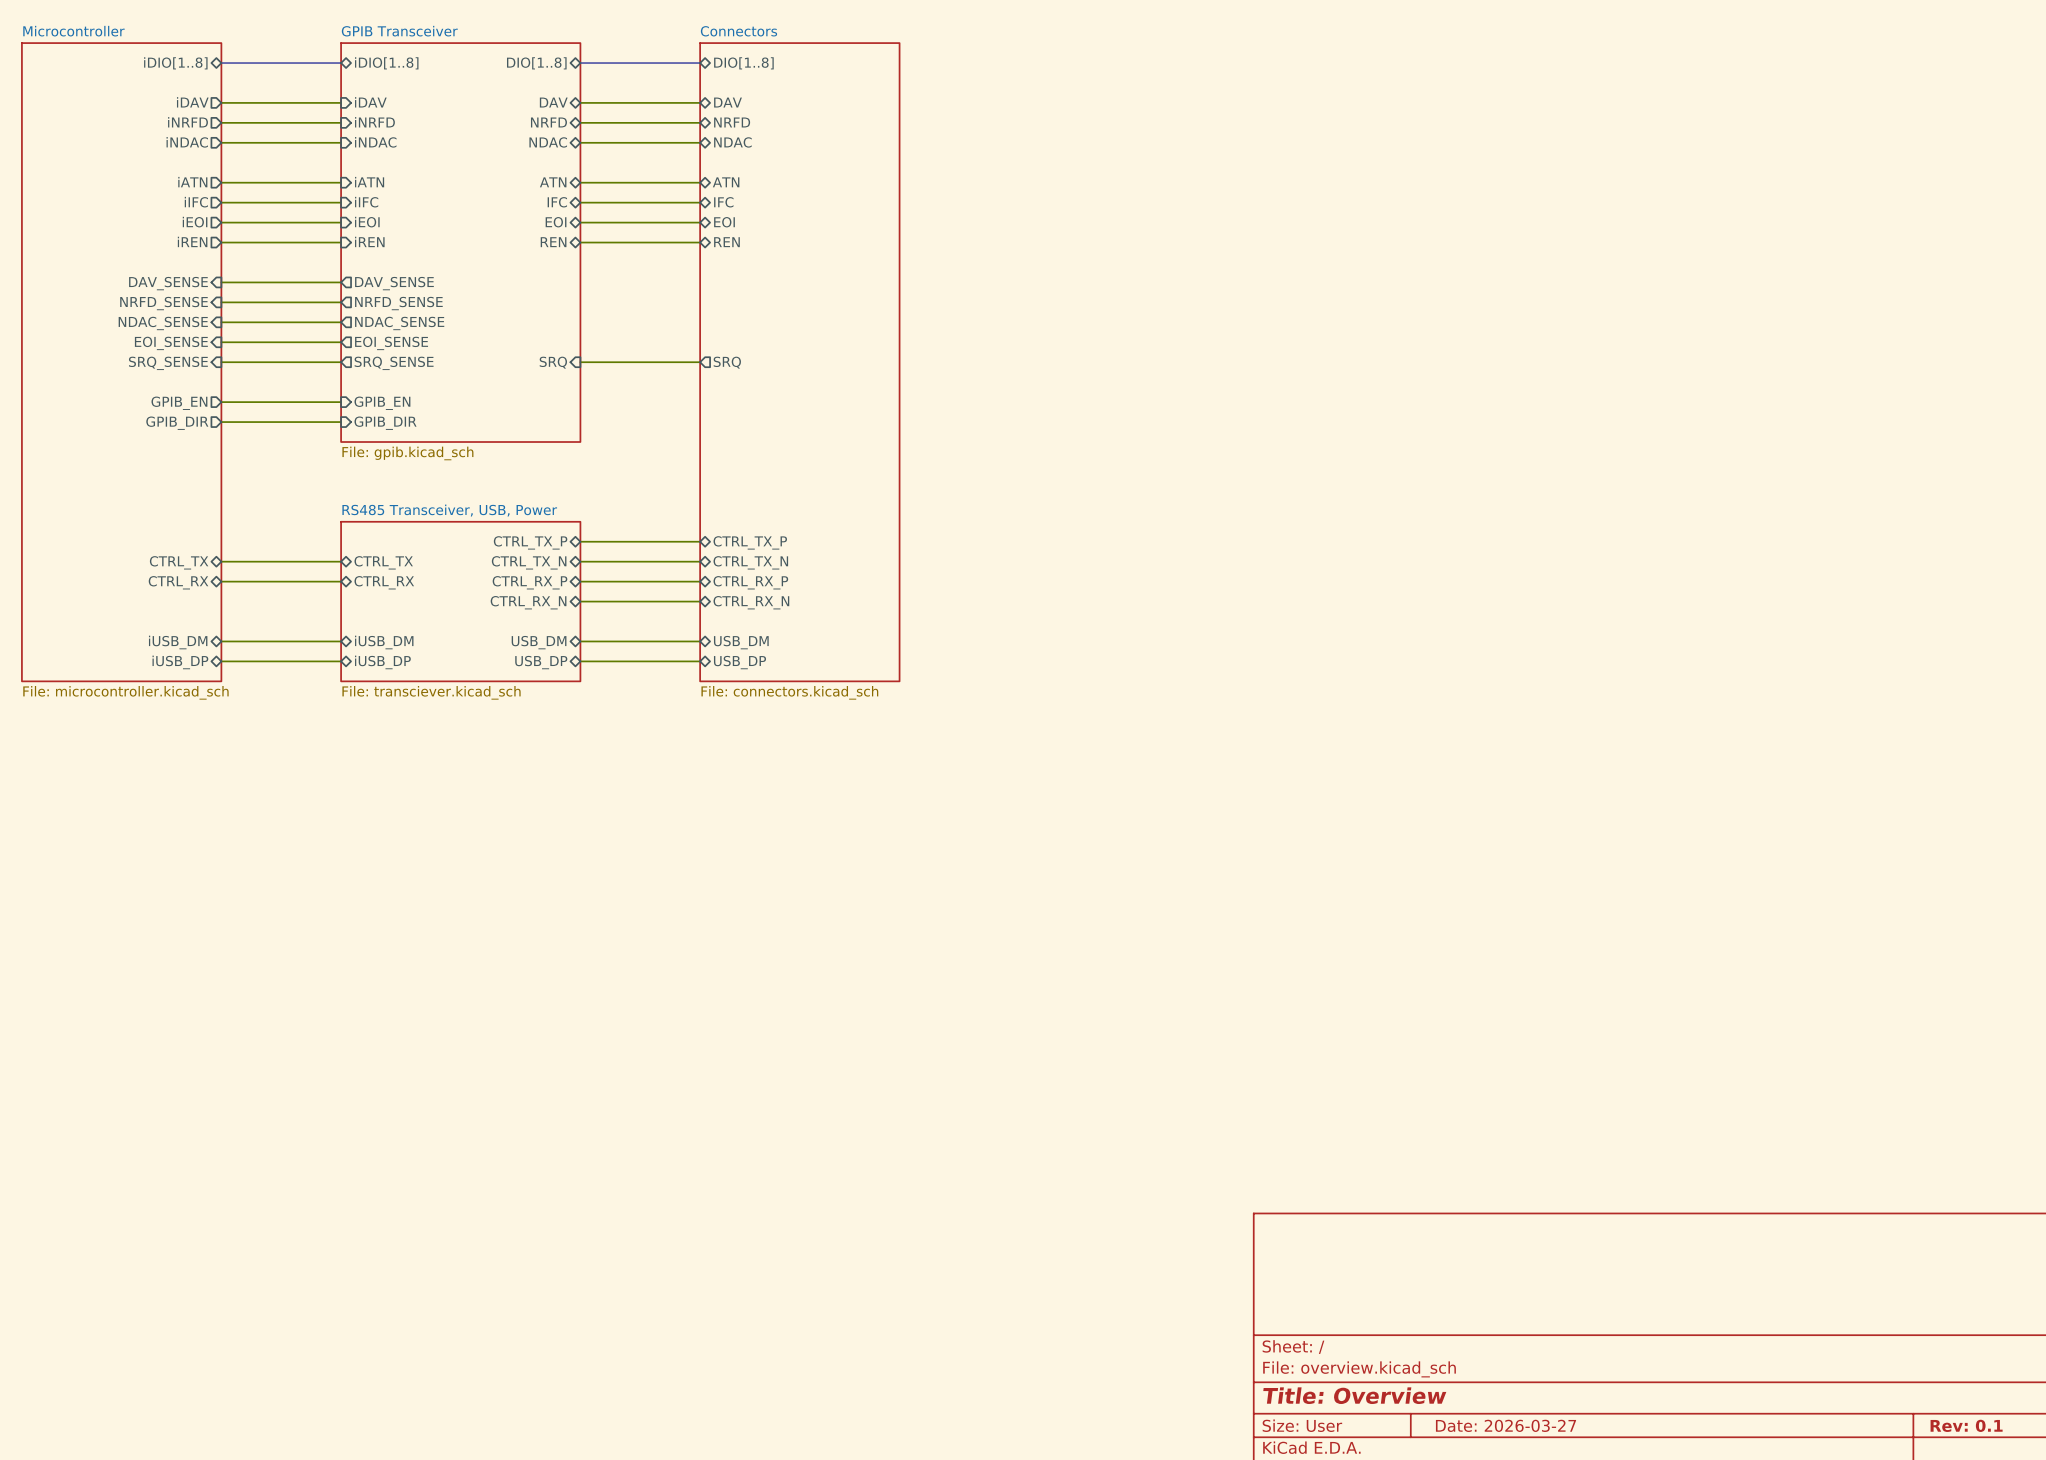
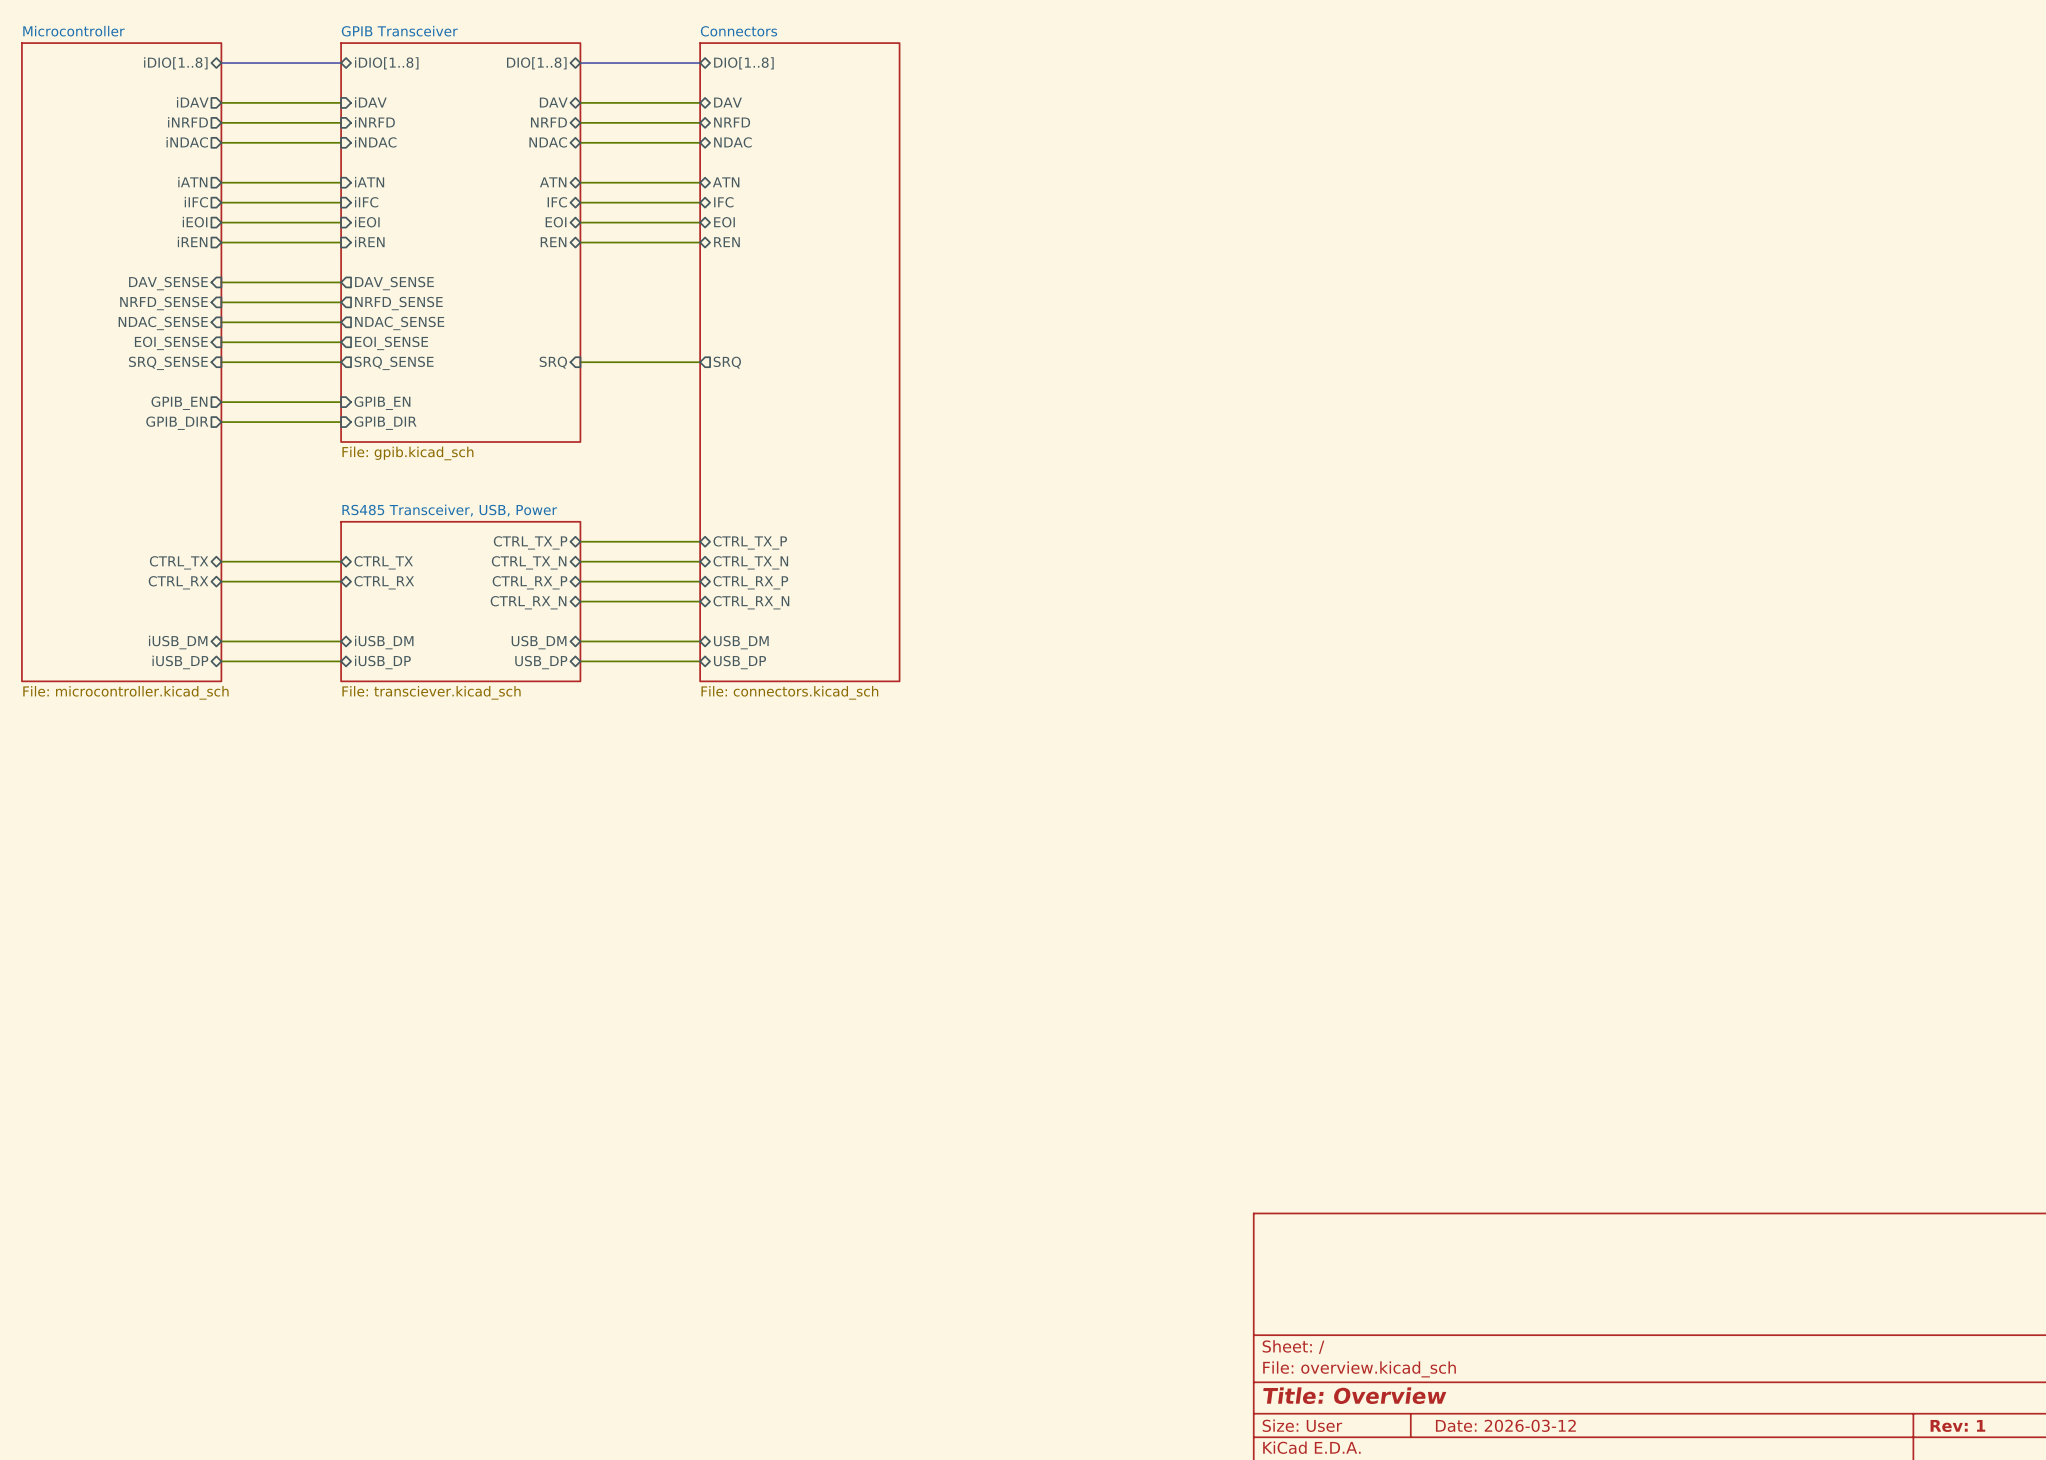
title block: Date: 2026-03-27 (1506, 1425) -> Date: 2026-03-12 (1505, 1425)
title block: Rev: 0.1 (1966, 1425) -> Rev: 1 (1957, 1425)

